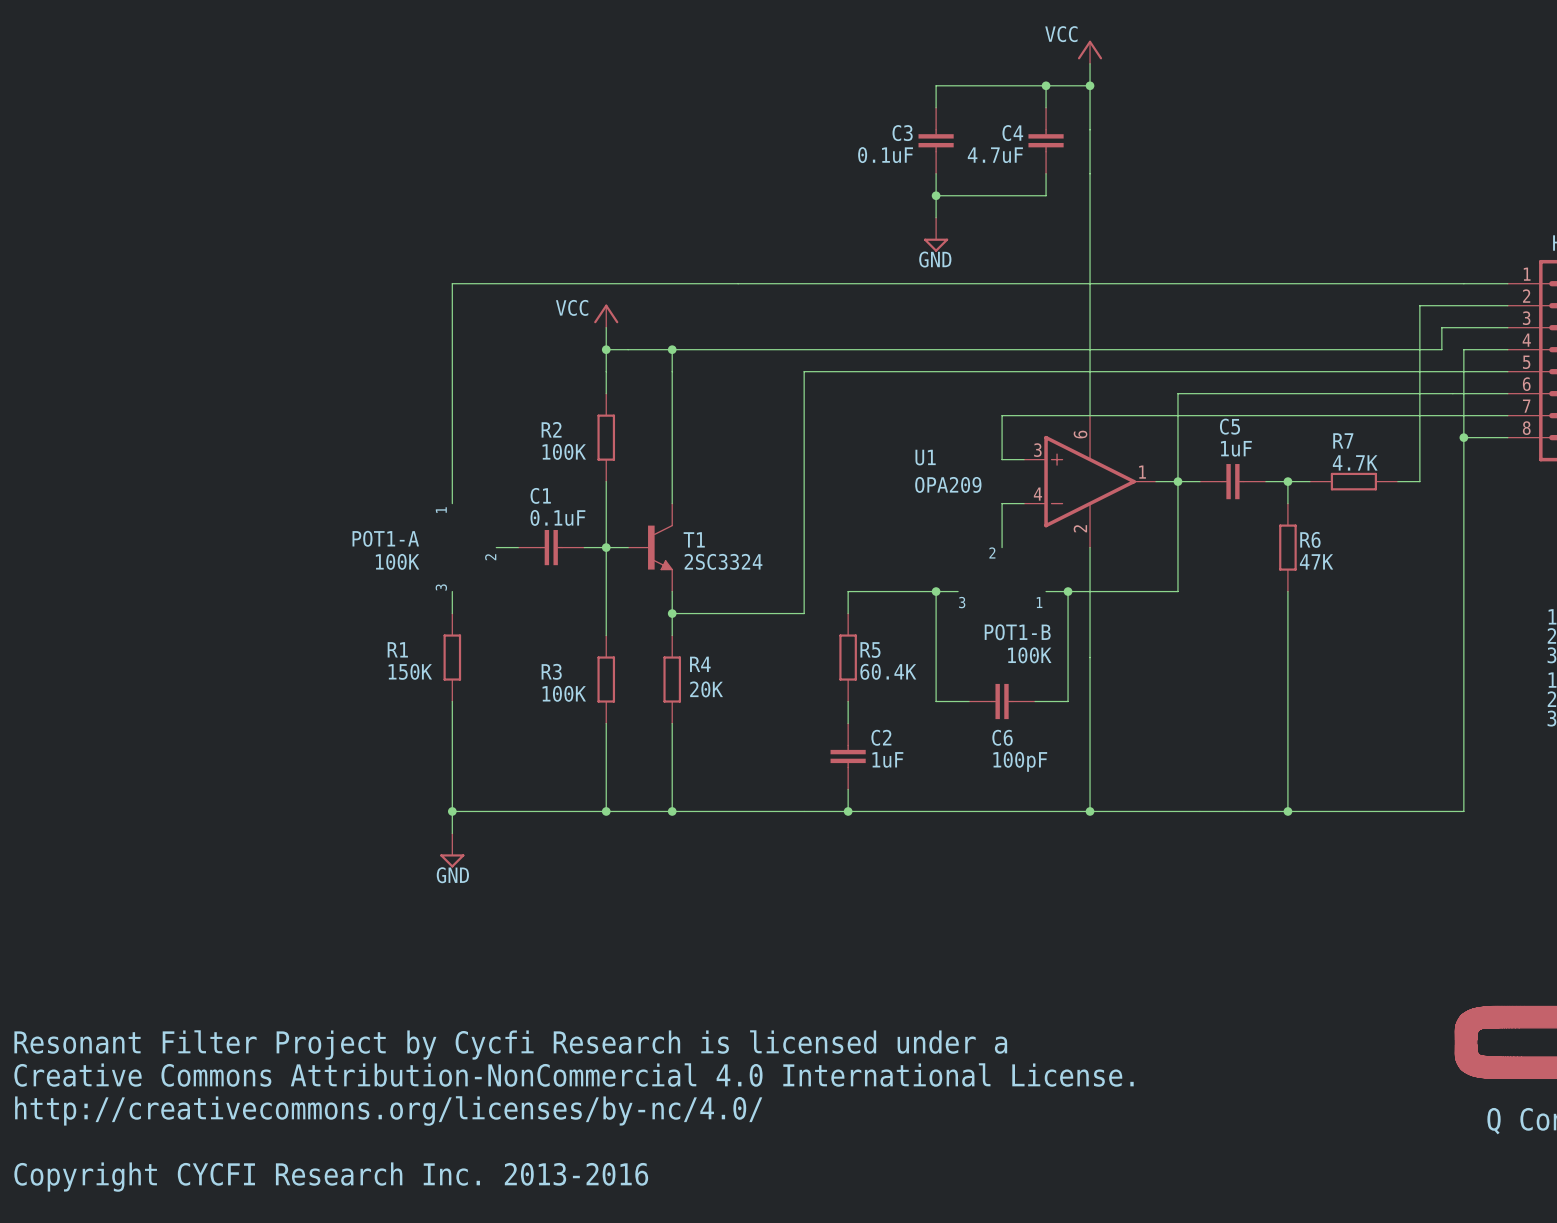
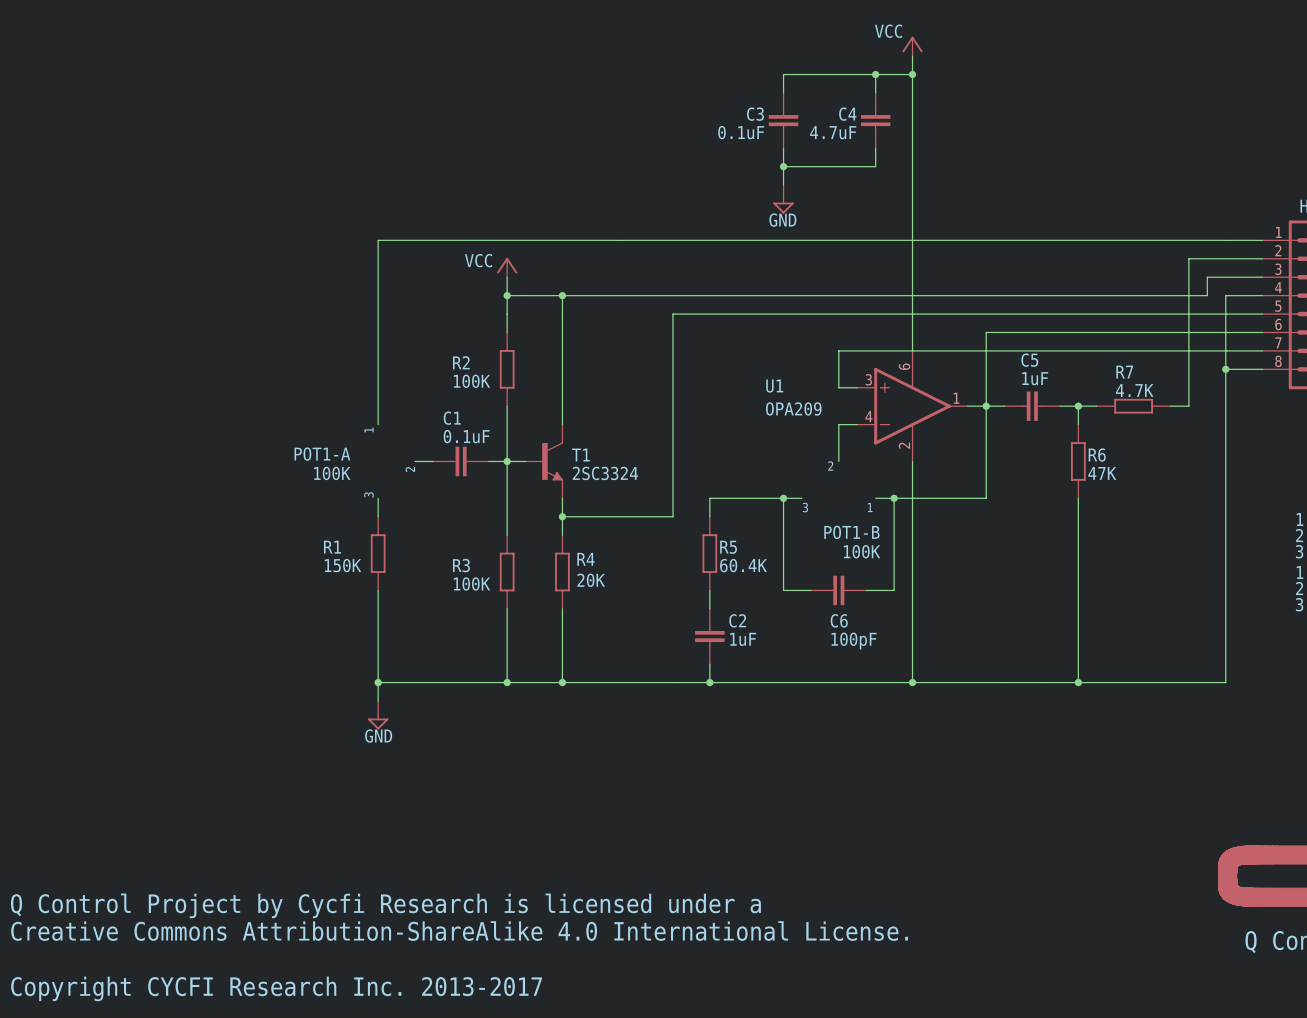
text: Resonant Filter Project by Cycfi Research is licensed under a (510, 1044) -> none
text: Creative Commons Attribution-NonCommercial 4.0 International License. (574, 1075) -> Q Control Project by Cycfi Research is licensed under a (385, 905)
text: http://creativecommons.org/licenses/by-nc/4.0/ (388, 1111) -> Creative Commons Attribution-ShareAlike 4.0 International License. (459, 931)
text: Copyright CYCFI Research Inc. 2013-2016 (331, 1177) -> Copyright CYCFI Research Inc. 2013-2017 (276, 988)

